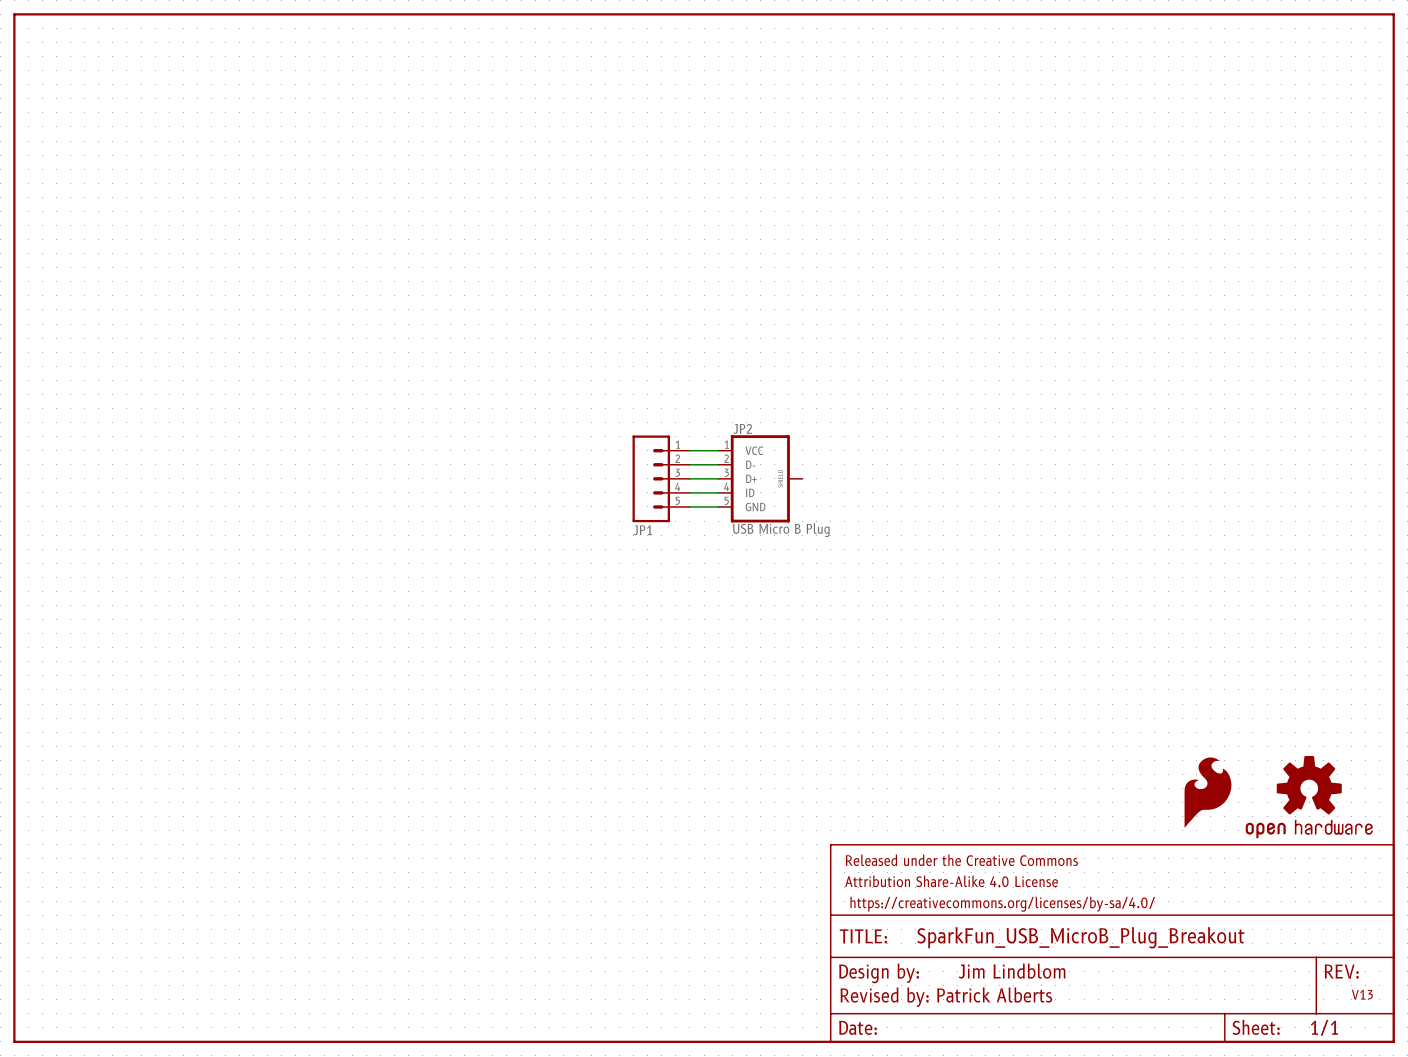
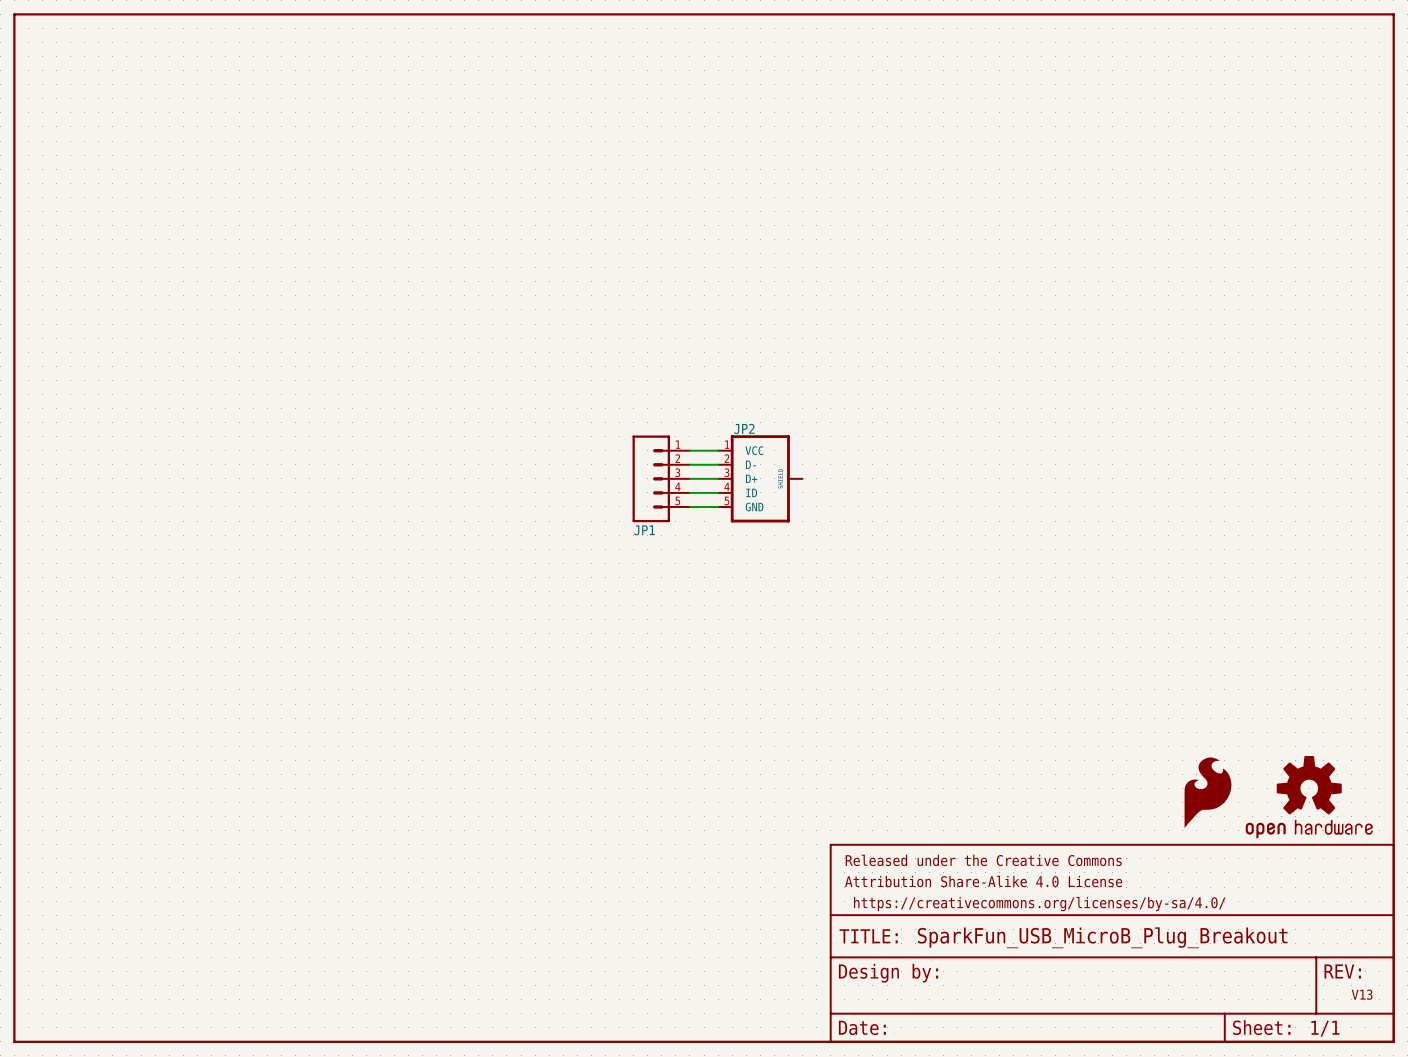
JP2 value: USB Micro B Plug (781, 530) -> none
text: Jim Lindblom (1012, 971) -> none
text: Revised by: Patrick Alberts (946, 997) -> none

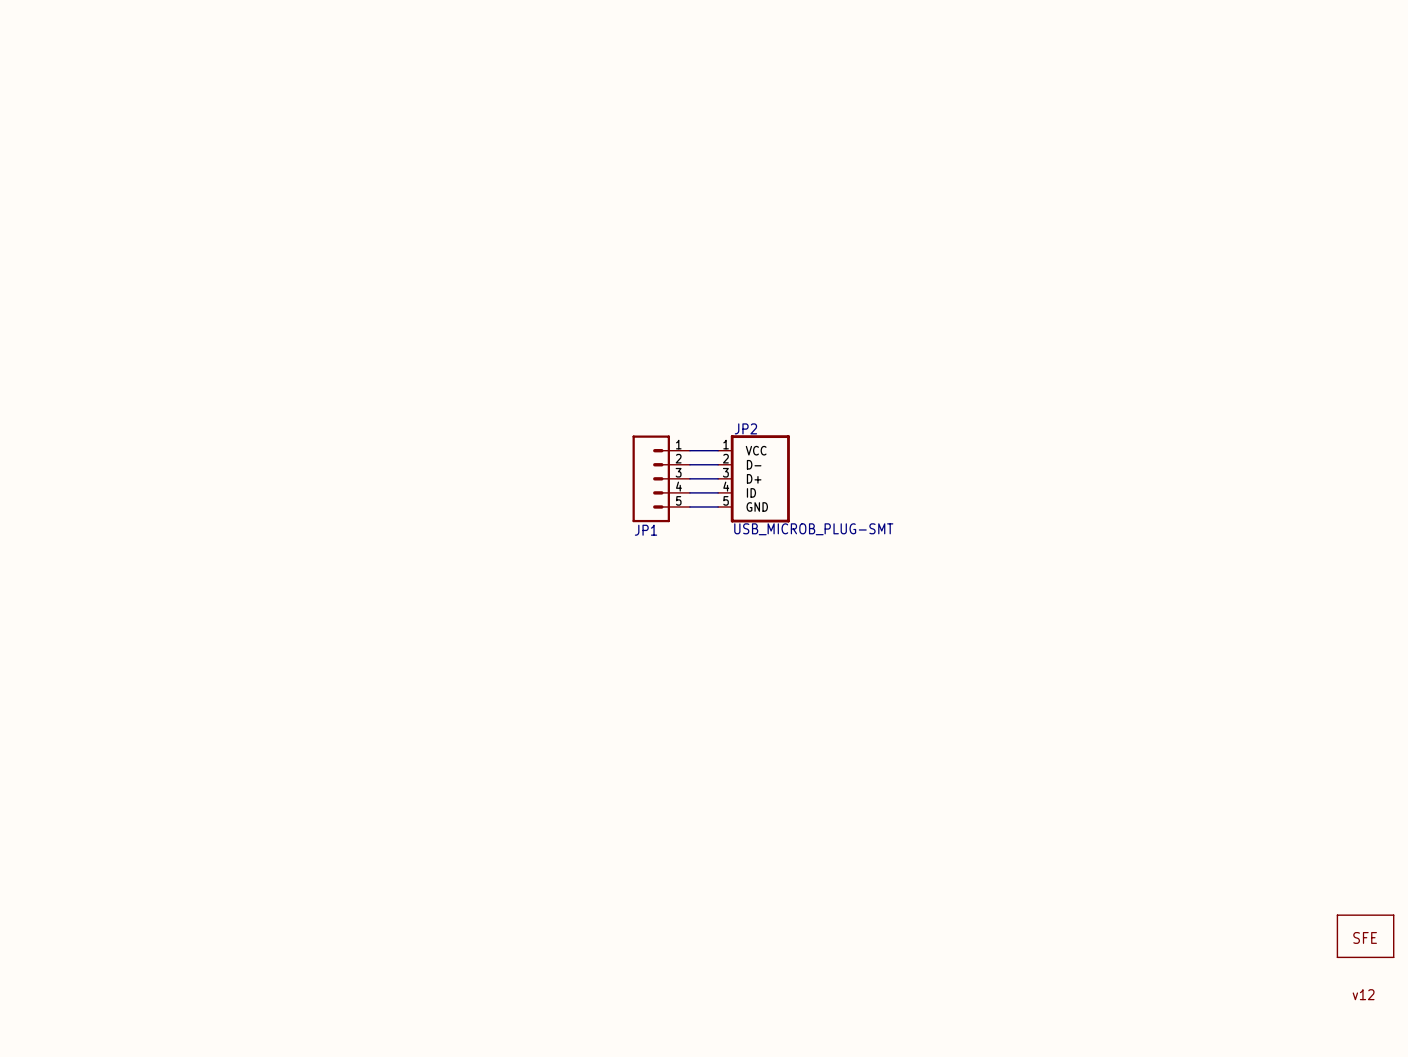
JP2 symbol: [718, 435, 803, 523] -> [718, 435, 790, 523]
part: (704, 528) -> none
JP2 value: none -> USB_MICROB_PLUG-SMT (813, 529)
part: (1208, 792) -> none
part: (1309, 797) -> none
part: none -> (1365, 936)
part: (1112, 943) -> none
text: V13 (1362, 994) -> v12 (1363, 994)

